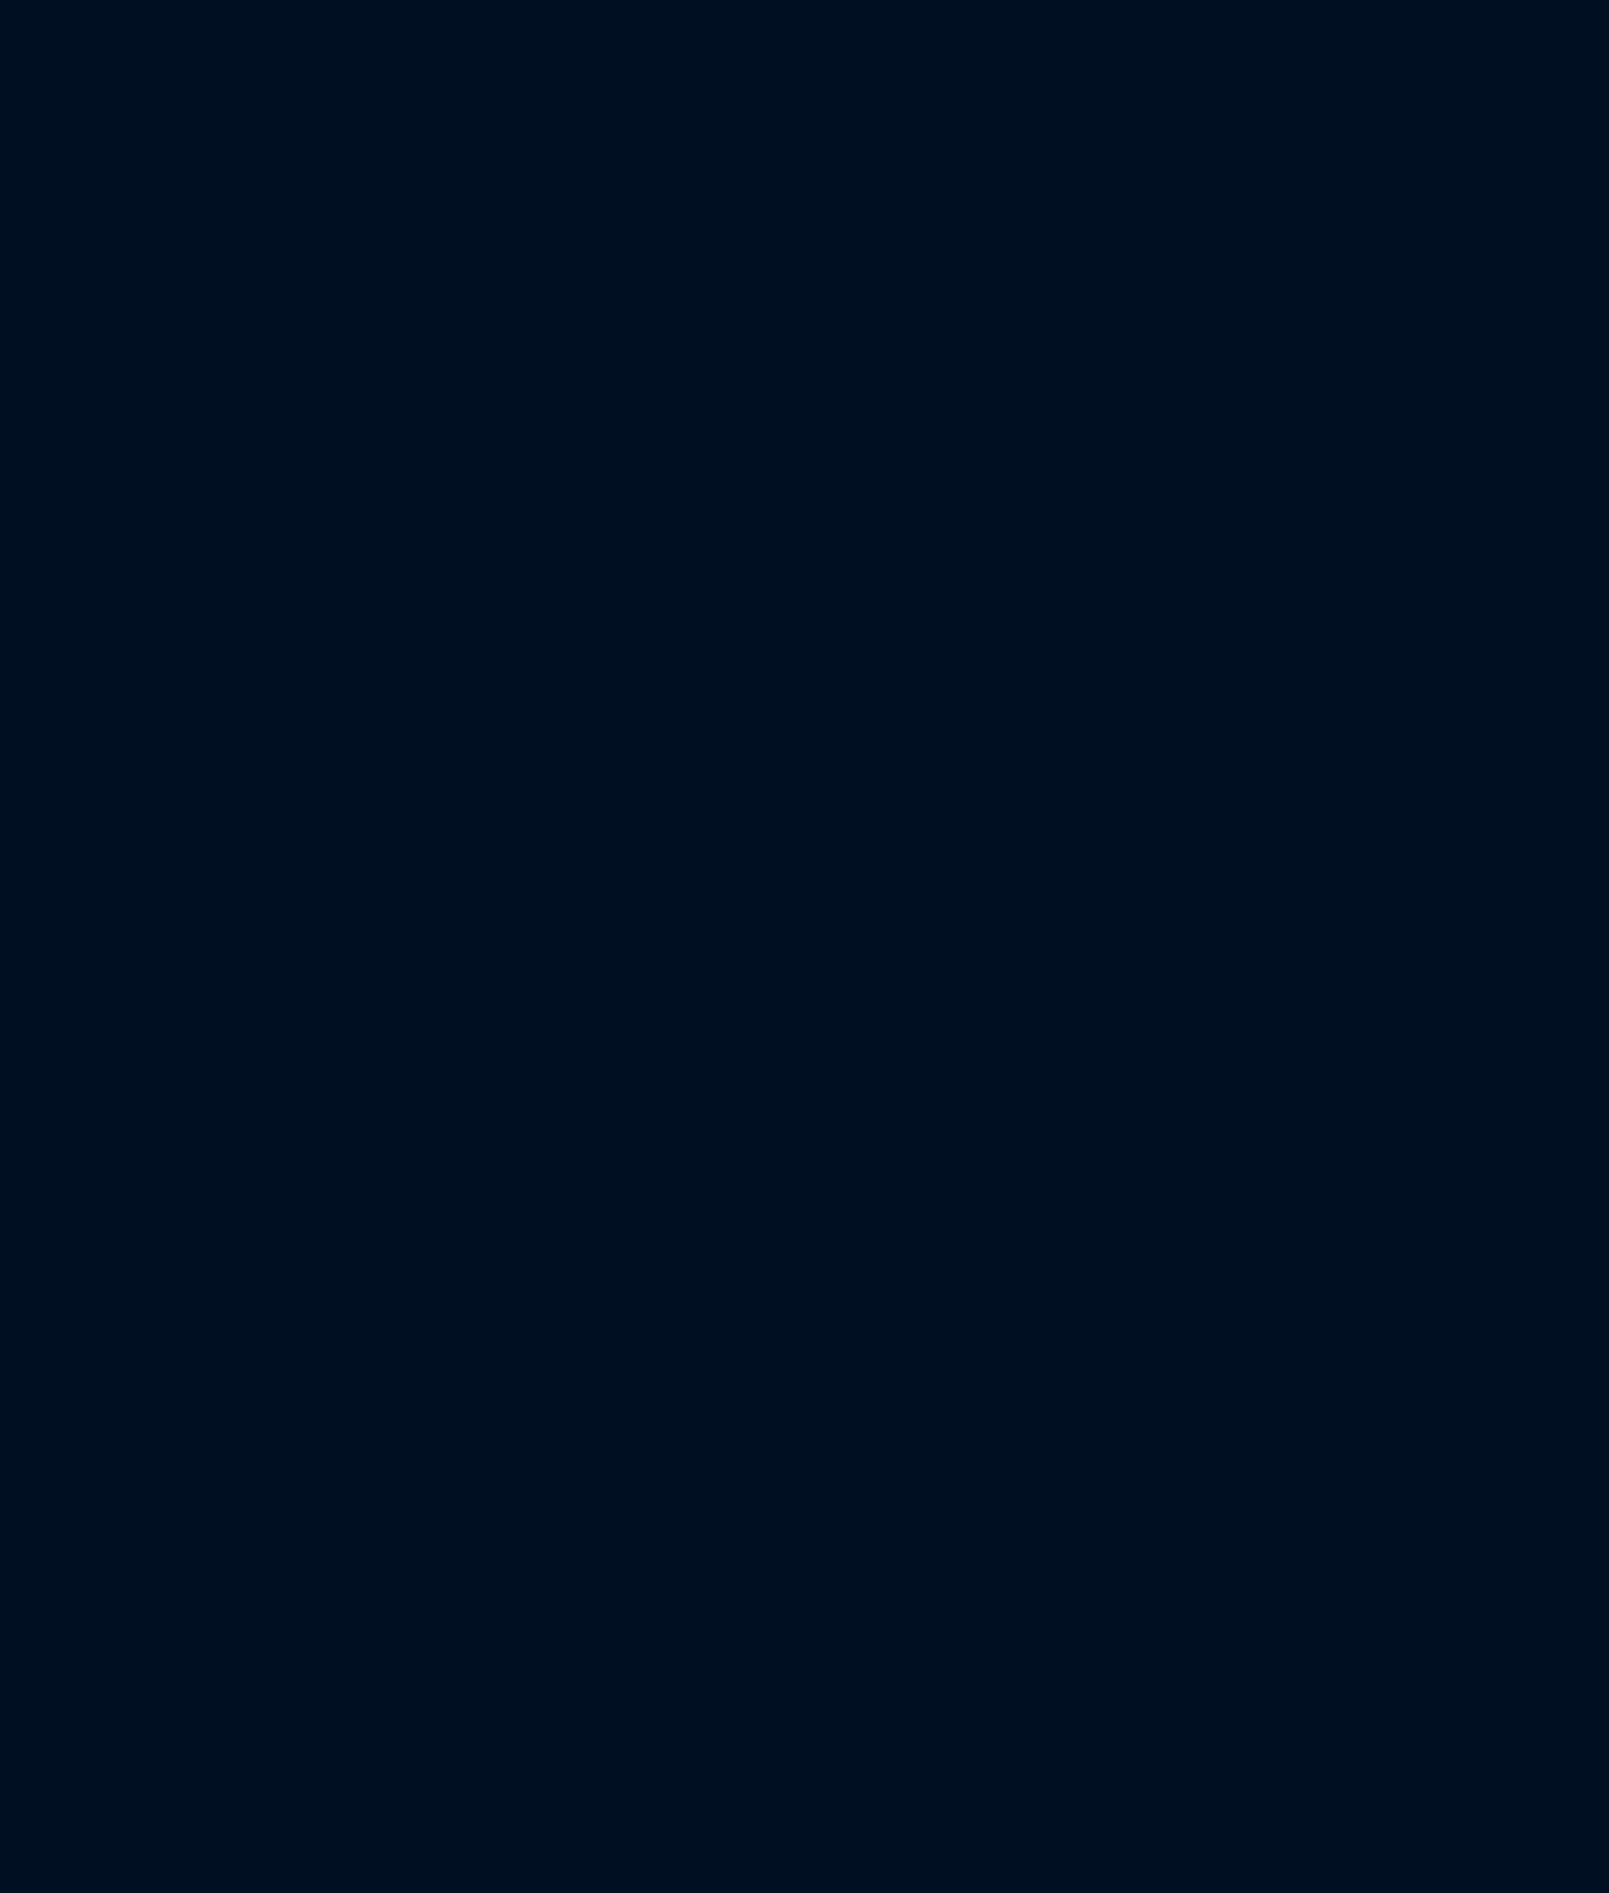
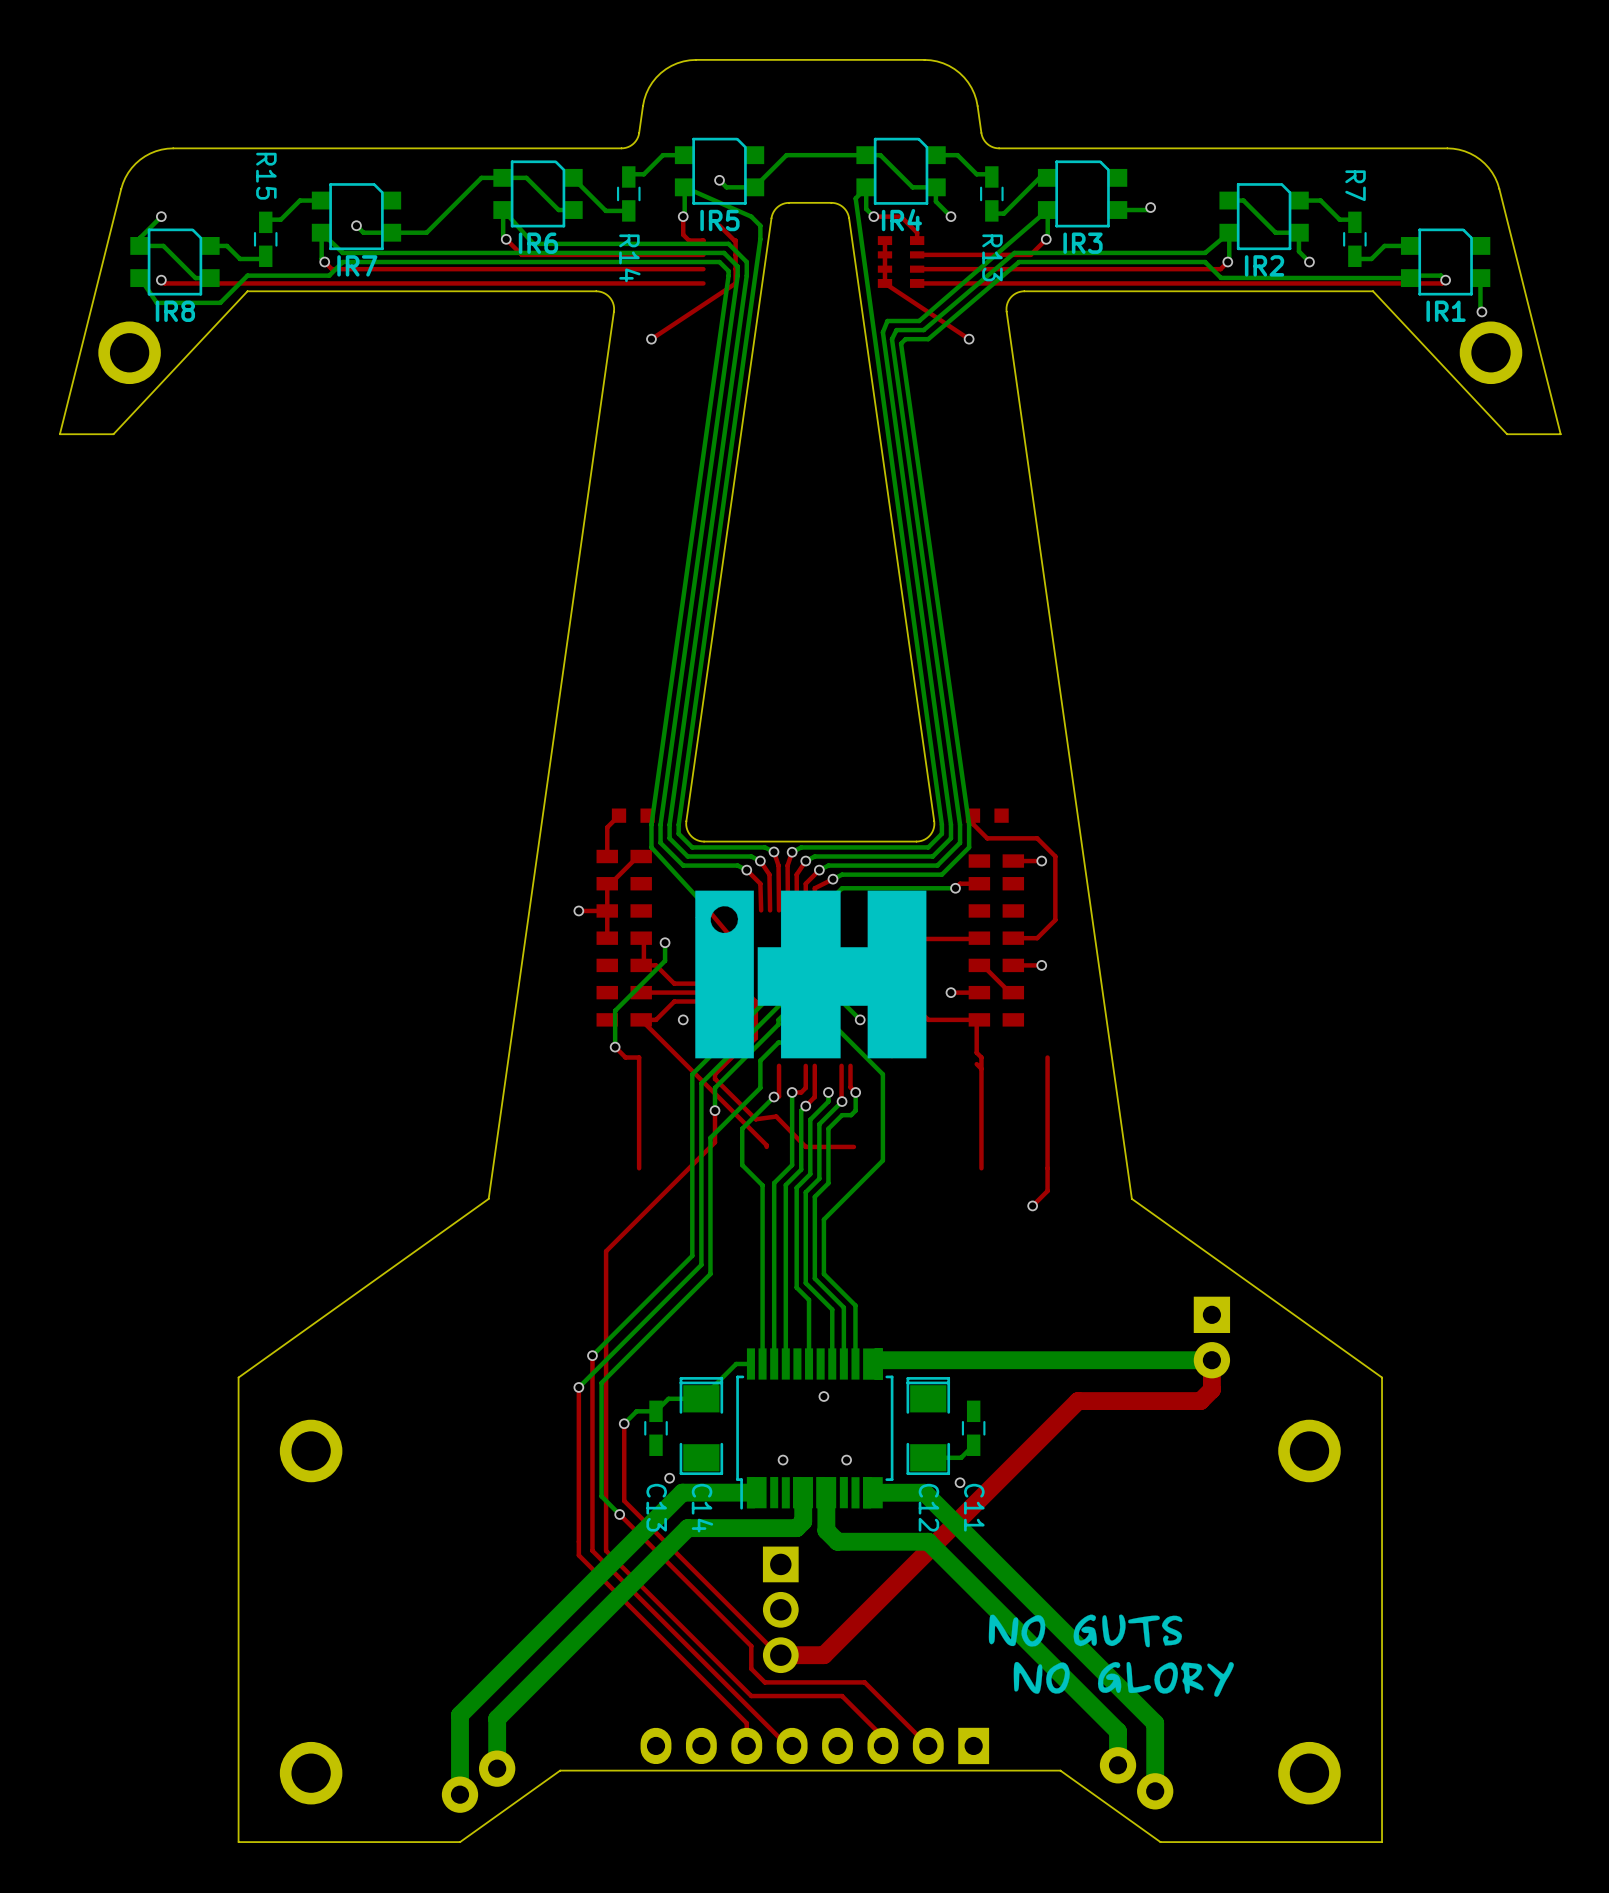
board edge: none -> (924, 59) (683, 61) (665, 69) (652, 82) (644, 99) (638, 137) (631, 145) (623, 148) (167, 148) (155, 151) (140, 159) (128, 172) (122, 183) (59, 434) (113, 434) (247, 291) (596, 291) (608, 295) (614, 307) (488, 1198) (238, 1377) (238, 1842) (460, 1842) (560, 1770) (1060, 1770) (1160, 1842) (1382, 1842) (1382, 1377) (1131, 1198) (1006, 307) (1012, 295) (1024, 291) (1373, 291) (1507, 434) (1560, 434) (1499, 188) (1495, 177) (1484, 163) (1470, 153) (1453, 148) (994, 147) (987, 143) (982, 137) (976, 99) (968, 82) (959, 73) (949, 65) (937, 61) (924, 59)
bottom track: none -> (684, 155) (663, 155) (643, 174) (628, 174)
bottom track: none -> (935, 155) (957, 155) (976, 174) (991, 174)
IR5: none -> (719, 171)
IR4: none -> (901, 171)
bottom track: none -> (572, 177) (605, 210) (628, 210)
bottom track: none -> (1047, 177) (1039, 177) (1003, 213) (991, 213)
bottom track: none -> (719, 180) (726, 187) (754, 187) (786, 155) (880, 155) (912, 187) (935, 187) (935, 201) (950, 216)
via: none -> (719, 180)
bottom track: none -> (866, 187) (855, 198) (941, 833) (928, 847) (801, 847) (792, 852)
bottom track: none -> (866, 187) (866, 209) (873, 216)
IR6: none -> (538, 193)
R14: none -> (628, 193)
R13: none -> (991, 193)
IR3: none -> (1082, 193)
bottom track: none -> (321, 200) (299, 200) (280, 219) (265, 219)
bottom track: none -> (1229, 200) (1243, 200) (1275, 232) (1298, 232) (1298, 251) (1309, 262)
bottom track: none -> (1298, 200) (1320, 200) (1339, 219) (1354, 219)
board edge: none -> (831, 202) (784, 203) (775, 208) (771, 216) (686, 821) (689, 833) (699, 841) (916, 841) (928, 836) (933, 827) (849, 218) (843, 207) (831, 202)
bottom track: none -> (1150, 207) (1148, 210) (1117, 210)
via: none -> (1150, 207)
bottom track: none -> (572, 210) (558, 210) (526, 177) (481, 177) (426, 232) (363, 232) (356, 225)
bottom track: none -> (161, 216) (140, 237) (140, 245) (163, 245) (195, 278) (209, 278)
via: none -> (161, 216)
IR7: none -> (356, 216)
top track: none -> (683, 216) (683, 234) (689, 240) (703, 240)
bottom track: none -> (683, 216) (684, 187) (751, 216) (760, 225) (760, 239) (678, 833) (692, 847) (764, 847) (773, 851)
via: none -> (683, 216)
top track: none -> (873, 216) (901, 216) (917, 232) (917, 240)
via: none -> (873, 216)
via: none -> (950, 216)
IR2: none -> (1264, 216)
via: none -> (356, 225)
top track: none -> (719, 225) (735, 240) (735, 283) (651, 339)
R15: none -> (265, 239)
top track: none -> (506, 239) (521, 254) (703, 254)
bottom track: none -> (506, 239) (503, 236) (503, 210) (533, 243) (728, 243) (746, 262) (746, 275) (669, 824) (669, 838) (687, 856) (751, 856) (760, 861)
via: none -> (506, 239)
top track: none -> (1046, 239) (1030, 254) (917, 254)
bottom track: none -> (1046, 239) (1047, 210) (919, 321) (887, 321) (882, 332) (950, 824) (950, 838) (932, 856) (814, 856) (805, 861)
via: none -> (1046, 239)
R7: none -> (1354, 239)
top track: none -> (884, 240) (884, 283)
bottom track: none -> (209, 245) (226, 245) (240, 258) (265, 258)
bottom track: none -> (1410, 245) (1384, 245) (1371, 258) (1354, 258)
IR8: none -> (174, 262)
top track: none -> (324, 262) (331, 269) (703, 269)
bottom track: none -> (324, 262) (321, 258) (321, 232) (342, 252) (724, 252) (737, 266) (660, 824) (660, 842) (683, 865) (737, 865) (746, 870)
via: none -> (324, 262)
part: none -> (901, 262)
top track: none -> (1227, 262) (1220, 269) (917, 269)
bottom track: none -> (1227, 262) (1229, 232) (1205, 252) (1014, 252) (923, 330) (896, 330) (891, 339) (960, 824) (960, 842) (937, 865) (828, 865) (819, 870)
via: none -> (1227, 262)
via: none -> (1309, 262)
IR1: none -> (1445, 262)
bottom track: none -> (1480, 278) (1481, 311)
bottom track: none -> (138, 279) (140, 278) (156, 302) (220, 302) (247, 275) (329, 275) (342, 262) (719, 262) (728, 271) (651, 824) (651, 847) (701, 901)
top track: none -> (161, 280) (164, 283) (703, 283)
via: none -> (161, 280)
top track: none -> (1445, 280) (1442, 283) (917, 283)
bottom track: none -> (1445, 280) (1441, 275) (1413, 275) (1410, 278) (1220, 277) (1205, 262) (1019, 262) (928, 339) (905, 339) (901, 343) (969, 824) (969, 847) (941, 874) (842, 874) (832, 879)
via: none -> (1445, 280)
top track: none -> (884, 283) (969, 339)
via: none -> (1481, 311)
via: none -> (651, 339)
via: none -> (969, 339)
part: none -> (129, 352)
part: none -> (1491, 352)
top track: none -> (619, 815) (607, 827) (607, 856)
part: none -> (633, 815)
top track: none -> (972, 815) (972, 824) (987, 838) (1037, 838) (1055, 856) (1055, 920) (1037, 938) (1013, 938)
part: none -> (987, 815)
top track: none -> (773, 851) (778, 865) (779, 910)
via: none -> (773, 851)
top track: none -> (792, 852) (787, 865) (787, 910)
via: none -> (792, 852)
part: none -> (624, 856)
top track: none -> (641, 856) (637, 856) (610, 883) (607, 883) (607, 938)
top track: none -> (760, 861) (769, 874) (770, 910)
via: none -> (760, 861)
top track: none -> (805, 861) (796, 874) (796, 910)
via: none -> (805, 861)
part: none -> (996, 861)
top track: none -> (1041, 861) (1013, 861)
via: none -> (1041, 861)
top track: none -> (746, 870) (760, 883) (761, 910)
via: none -> (746, 870)
top track: none -> (819, 870) (805, 883) (805, 910)
via: none -> (819, 870)
top track: none -> (832, 879) (814, 888) (814, 910)
via: none -> (832, 879)
part: none -> (624, 883)
top track: none -> (976, 883) (960, 883) (955, 888)
part: none -> (996, 883)
bottom track: none -> (955, 888) (842, 888) (805, 924) (805, 933) (810, 938)
via: none -> (955, 888)
drawing: none -> [695, 890, 927, 1059]
top track: none -> (701, 901) (732, 938)
via: none -> (578, 910)
top track: none -> (607, 910) (578, 910)
part: none -> (624, 910)
part: none -> (996, 910)
part: none -> (624, 938)
top track: none -> (643, 938) (643, 962) (641, 965) (656, 965) (674, 983) (732, 983)
top track: none -> (979, 938) (888, 938)
part: none -> (996, 938)
bottom track: none -> (665, 942) (665, 960) (615, 1010) (615, 1047)
via: none -> (665, 942)
bottom track: none -> (810, 956) (692, 1074) (692, 1255) (592, 1355)
part: none -> (624, 965)
top track: none -> (979, 965) (982, 965) (1009, 992) (1013, 992)
part: none -> (996, 965)
top track: none -> (1041, 965) (1013, 965)
via: none -> (1041, 965)
bottom track: none -> (810, 974) (701, 1083) (701, 1264) (578, 1387)
part: none -> (624, 992)
top track: none -> (641, 992) (746, 992) (755, 1001) (755, 1038) (746, 1047) (742, 1047) (715, 1074) (715, 1078) (755, 1119) (776, 1116) (805, 1146) (853, 1146)
via: none -> (950, 992)
top track: none -> (979, 992) (950, 992)
part: none -> (996, 992)
top track: none -> (732, 1001) (674, 1001) (656, 1019) (641, 1019) (766, 1146)
top track: none -> (888, 1010) (919, 1011) (928, 1019) (979, 1019)
bottom track: none -> (823, 1015) (882, 1074) (882, 1160) (823, 1219) (823, 1274) (855, 1305) (855, 1363)
part: none -> (624, 1019)
via: none -> (683, 1019)
bottom track: none -> (860, 1019) (828, 988) (810, 988) (778, 1019) (778, 1024) (715, 1087) (715, 1110)
via: none -> (860, 1019)
top track: none -> (976, 1019) (976, 1052) (981, 1057) (981, 1168)
part: none -> (996, 1019)
bottom track: none -> (810, 1042) (778, 1042) (760, 1060) (760, 1087) (710, 1137) (710, 1274) (601, 1382) (601, 1496) (619, 1514)
top track: none -> (615, 1047) (625, 1057) (639, 1057) (639, 1168)
via: none -> (615, 1047)
top track: none -> (1047, 1057) (1047, 1191) (1032, 1205)
top track: none -> (976, 1064) (981, 1068)
top track: none -> (779, 1065) (779, 1096) (773, 1097)
top track: none -> (805, 1065) (805, 1087) (801, 1092) (792, 1092)
top track: none -> (814, 1065) (814, 1097) (805, 1106)
top track: none -> (841, 1065) (842, 1101)
top track: none -> (850, 1065) (850, 1087) (855, 1092)
bottom track: none -> (792, 1092) (792, 1165) (774, 1183) (774, 1363)
via: none -> (792, 1092)
bottom track: none -> (828, 1092) (828, 1101) (810, 1119) (810, 1174) (796, 1187) (796, 1287) (809, 1299) (809, 1363)
via: none -> (828, 1092)
bottom track: none -> (855, 1092) (855, 1110) (851, 1115) (842, 1115) (828, 1128) (828, 1183) (814, 1196) (814, 1278) (843, 1307) (843, 1363)
via: none -> (855, 1092)
bottom track: none -> (773, 1097) (742, 1128) (742, 1165) (762, 1185) (762, 1363)
via: none -> (773, 1097)
bottom track: none -> (842, 1101) (819, 1124) (819, 1178) (805, 1192) (805, 1283) (832, 1309) (832, 1363)
via: none -> (842, 1101)
bottom track: none -> (805, 1106) (801, 1110) (801, 1169) (785, 1185) (785, 1363)
via: none -> (805, 1106)
top track: none -> (715, 1110) (715, 1142) (606, 1251) (606, 1550) (751, 1696) (842, 1696) (882, 1736) (882, 1745)
via: none -> (715, 1110)
via: none -> (1032, 1205)
part: none -> (1211, 1337)
top track: none -> (592, 1355) (592, 1550) (787, 1745) (792, 1745)
via: none -> (592, 1355)
top track: none -> (1211, 1360) (1211, 1389) (1200, 1401) (1078, 1401) (823, 1655) (778, 1655) (624, 1500) (624, 1423)
bottom track: none -> (1211, 1360) (876, 1360) (872, 1364)
bottom track: none -> (750, 1363) (736, 1363) (701, 1398) (668, 1398) (656, 1411) (636, 1411) (624, 1423)
top track: none -> (578, 1387) (578, 1555) (746, 1723) (746, 1745)
via: none -> (578, 1387)
via: none -> (823, 1396)
via: none -> (624, 1423)
C14: none -> (701, 1426)
C12: none -> (928, 1426)
C13: none -> (656, 1428)
part: none -> (814, 1428)
C11: none -> (973, 1428)
bottom track: none -> (973, 1445) (961, 1457) (928, 1457)
part: none -> (311, 1450)
part: none -> (1309, 1450)
via: none -> (783, 1460)
via: none -> (846, 1460)
via: none -> (669, 1478)
via: none -> (960, 1482)
bottom track: none -> (750, 1492) (756, 1492) (682, 1492) (460, 1715) (460, 1794)
bottom track: none -> (797, 1492) (803, 1492) (803, 1521) (796, 1528) (687, 1528) (497, 1718) (497, 1768)
bottom track: none -> (820, 1492) (826, 1492) (826, 1530) (837, 1541) (928, 1541) (1118, 1731) (1118, 1765)
bottom track: none -> (872, 1492) (924, 1492) (1155, 1723) (1155, 1791)
top track: none -> (619, 1514) (751, 1646) (751, 1668) (764, 1682) (864, 1682) (928, 1745)
via: none -> (619, 1514)
part: none -> (780, 1609)
drawing: none -> [988, 1614, 1234, 1697]
part: none -> (814, 1745)
part: none -> (311, 1773)
part: none -> (1309, 1773)
part: none -> (1136, 1778)
part: none -> (478, 1781)

